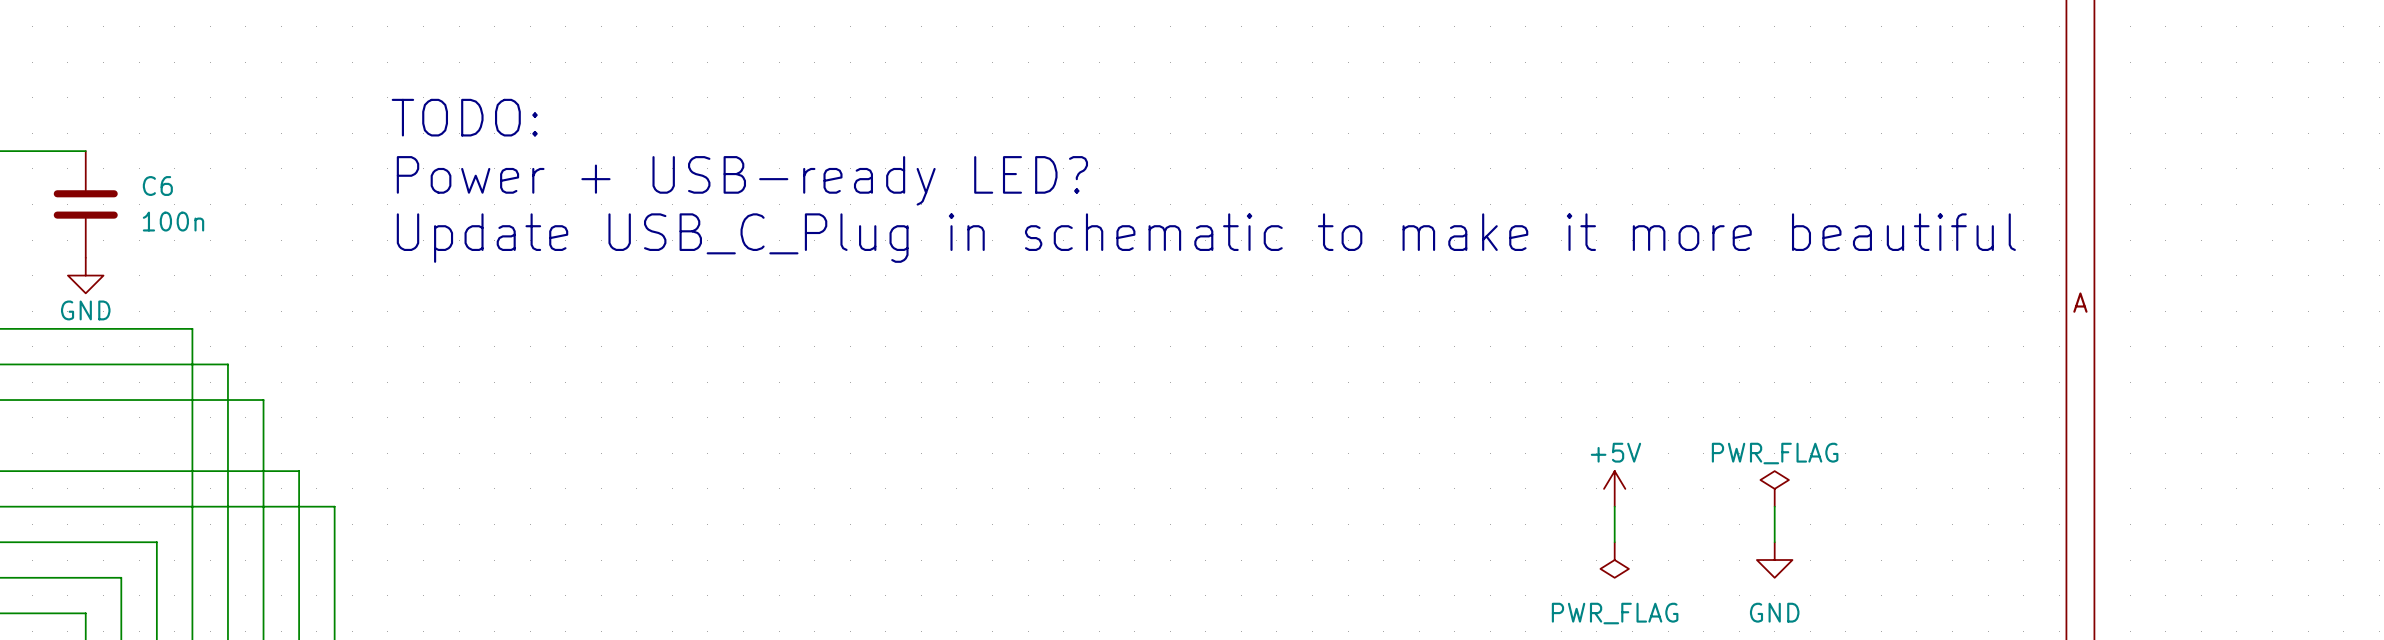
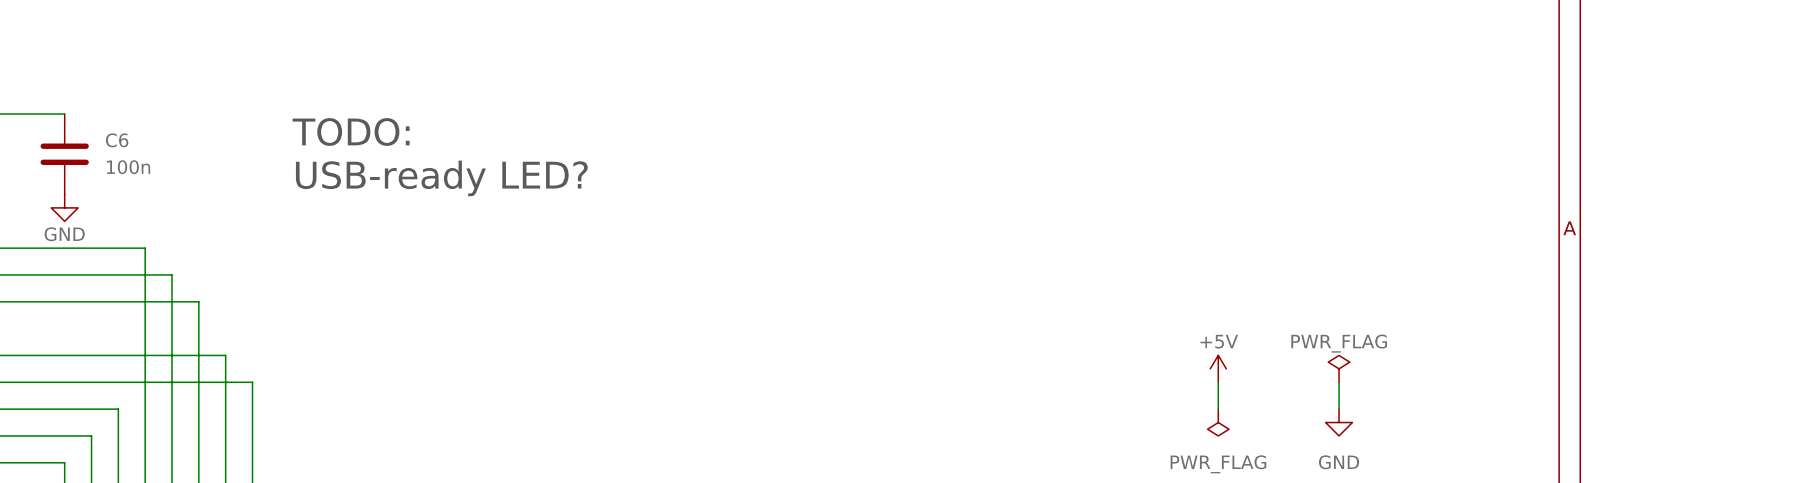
text: TODO: (464, 117) -> none
text: Power + USB-ready LED? (742, 180) -> TODO: (351, 131)
text: Update USB_C_Plug in schematic to make it more beautiful (1206, 238) -> USB-ready LED? (441, 178)

